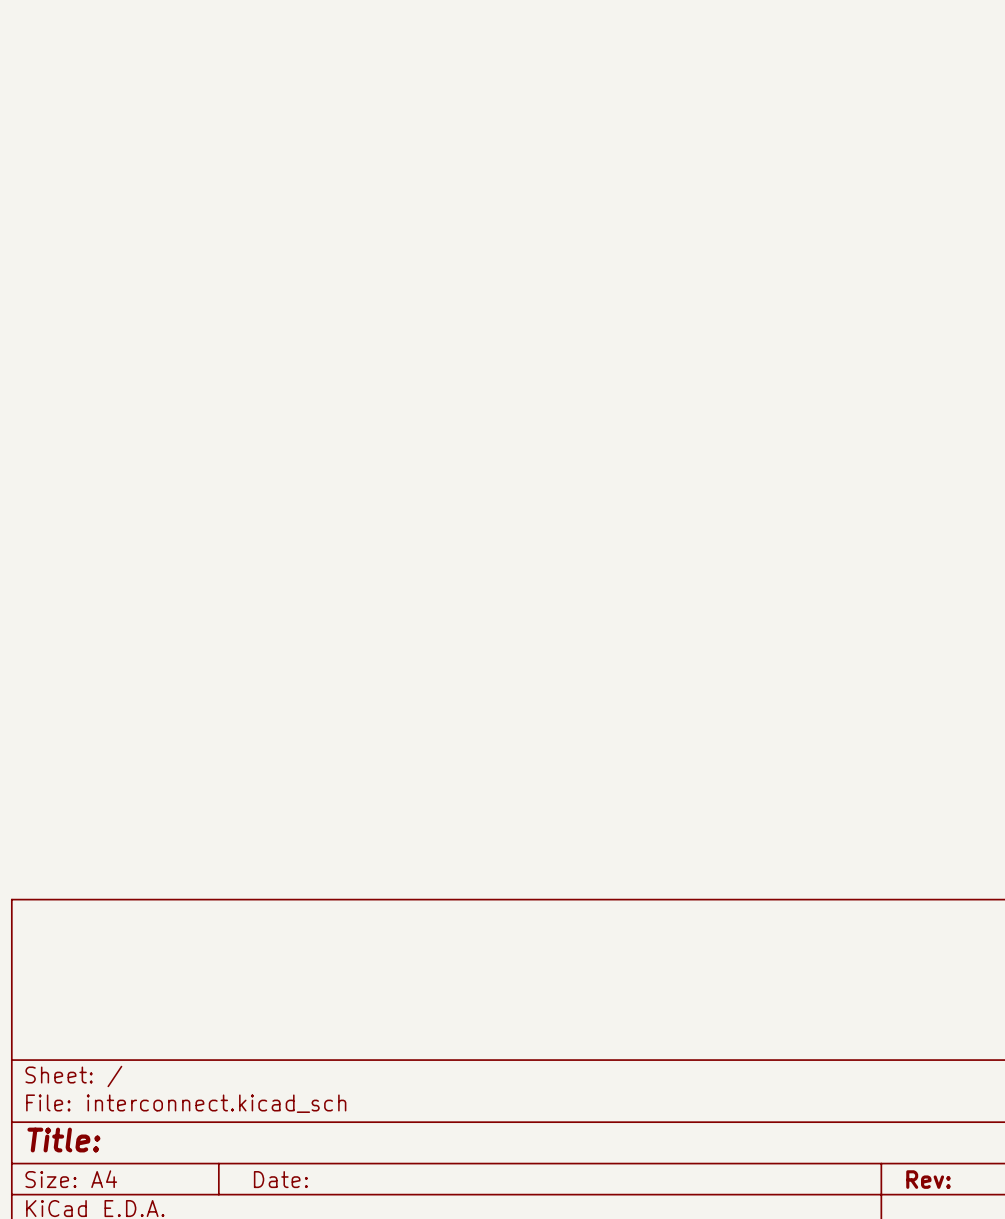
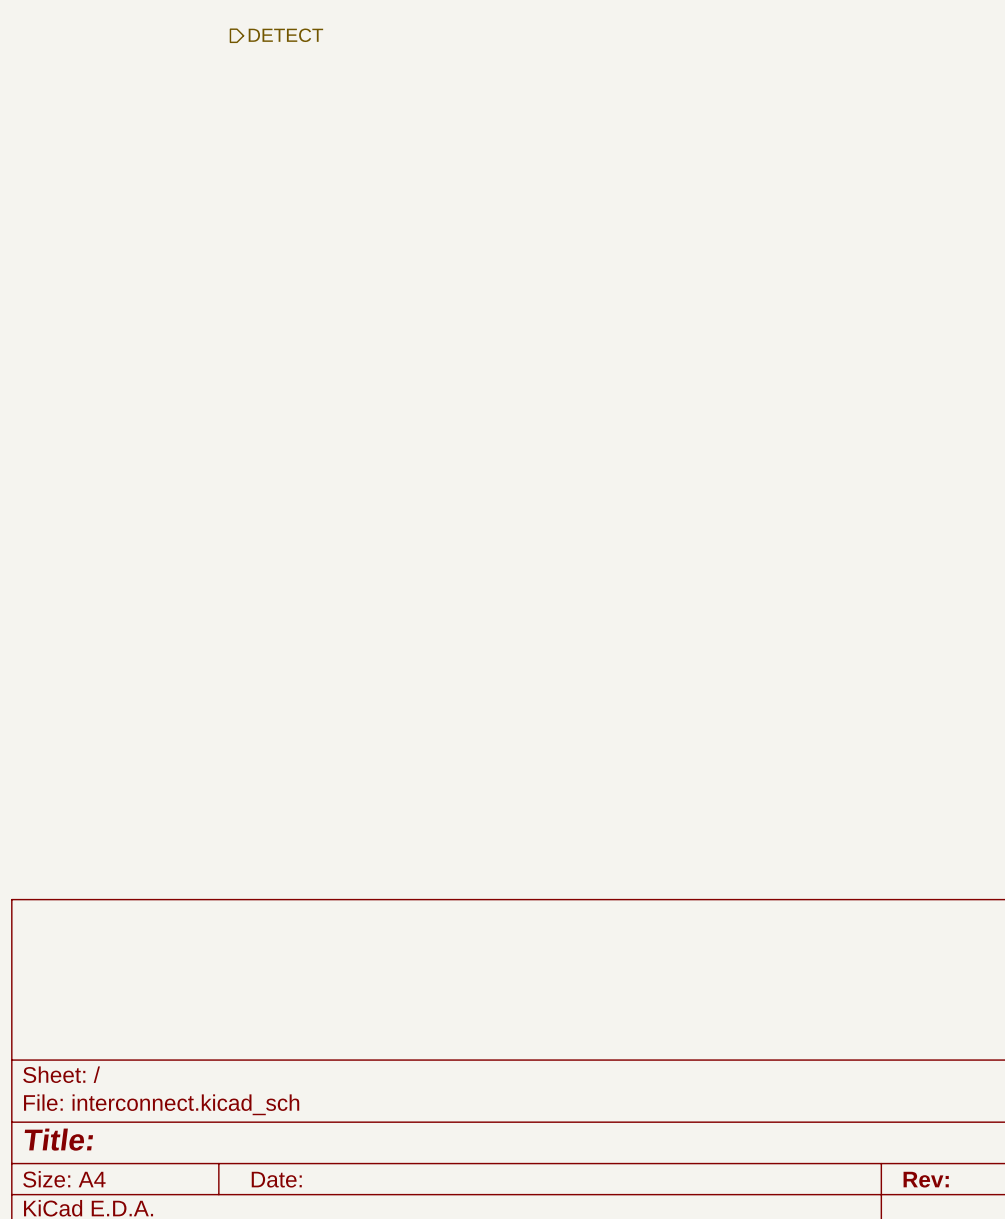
hierarchical label: none -> DETECT (285, 35)

